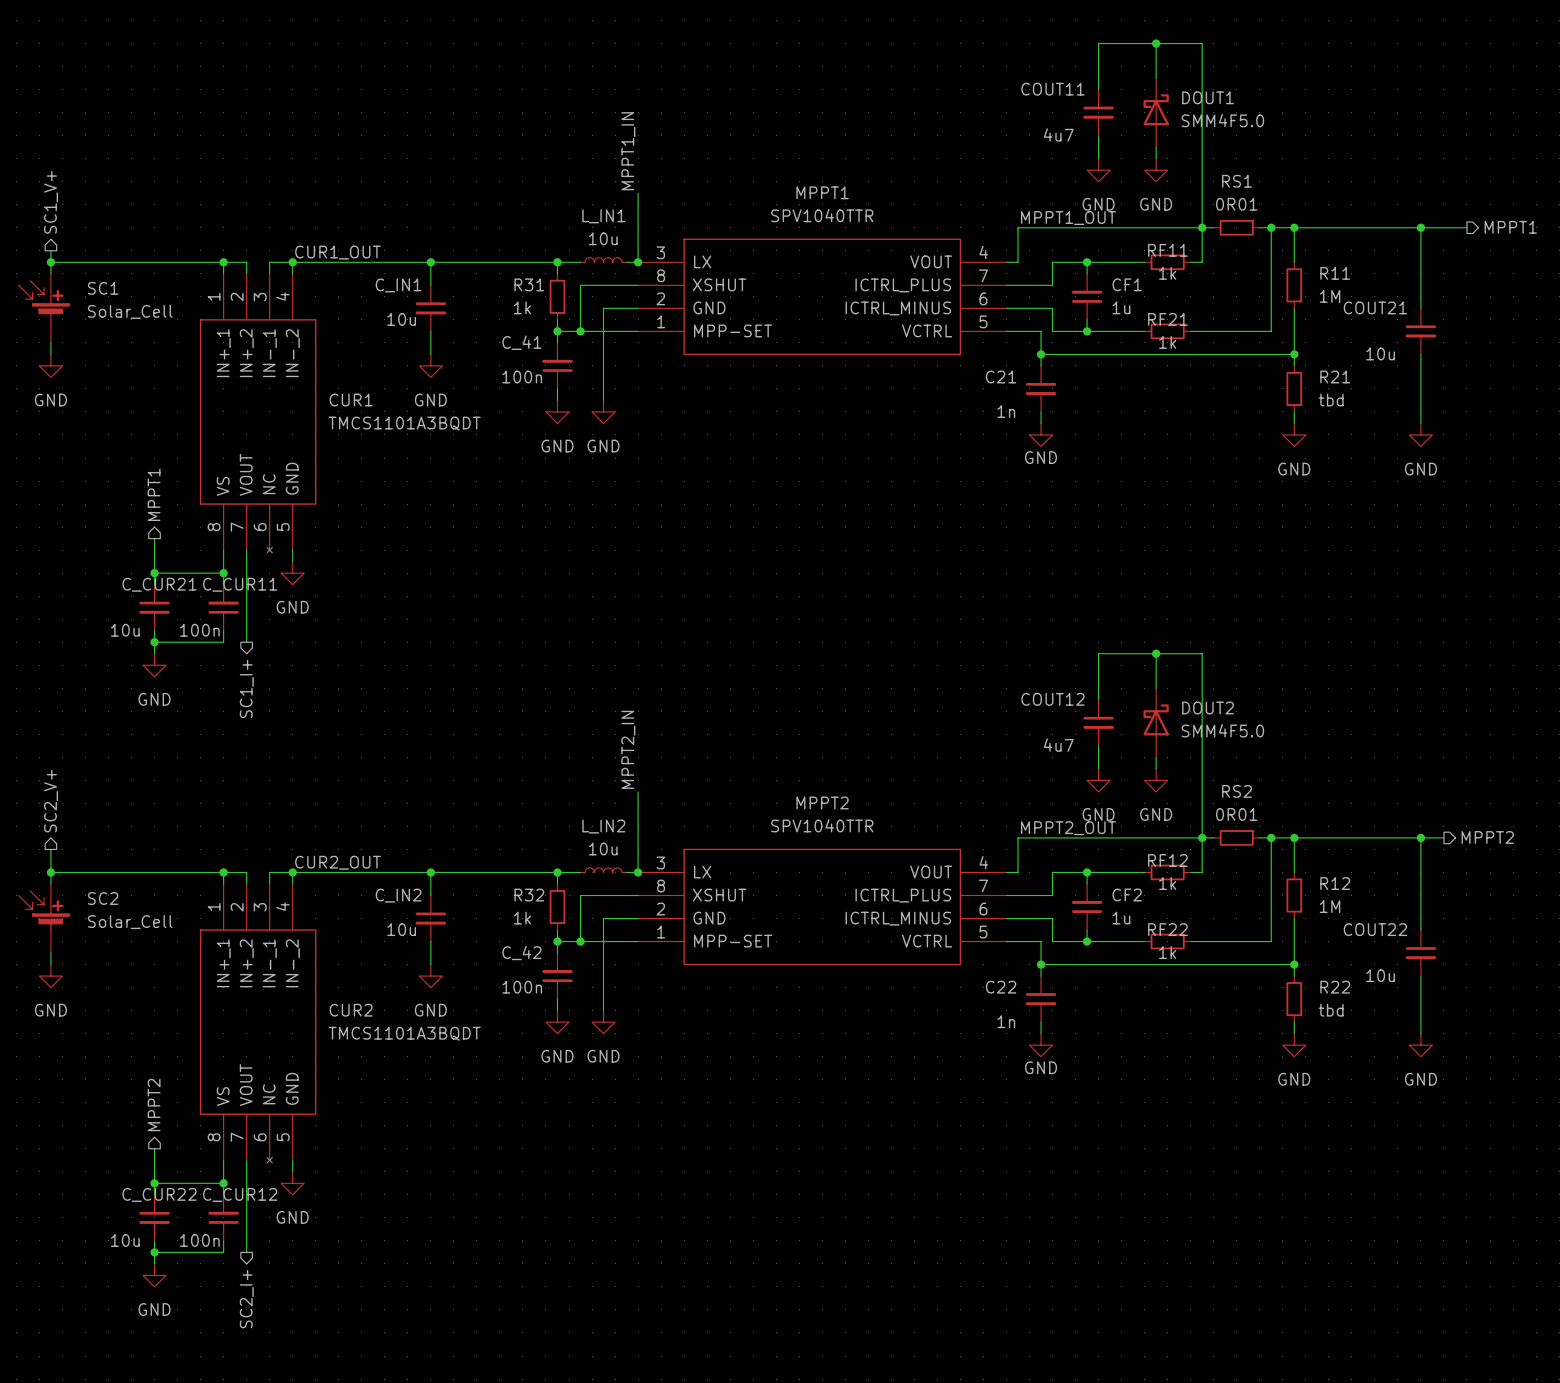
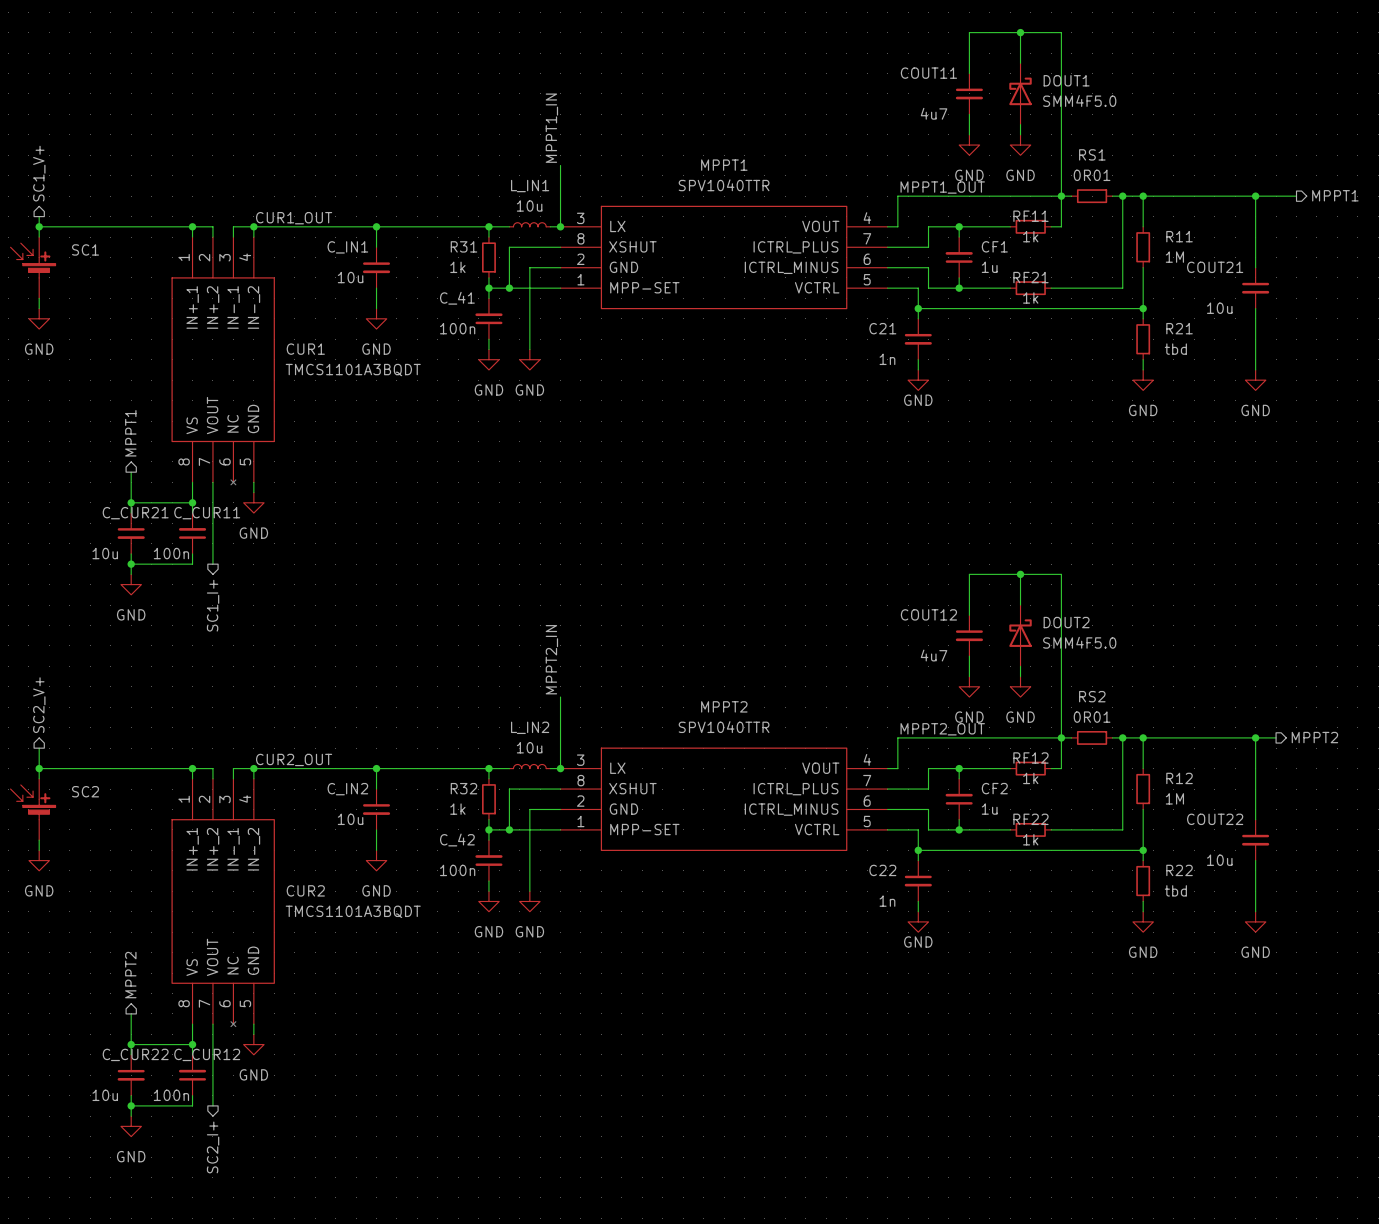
SC1 value: Solar_Cell (130, 311) -> none
SC2 value: Solar_Cell (130, 922) -> none

